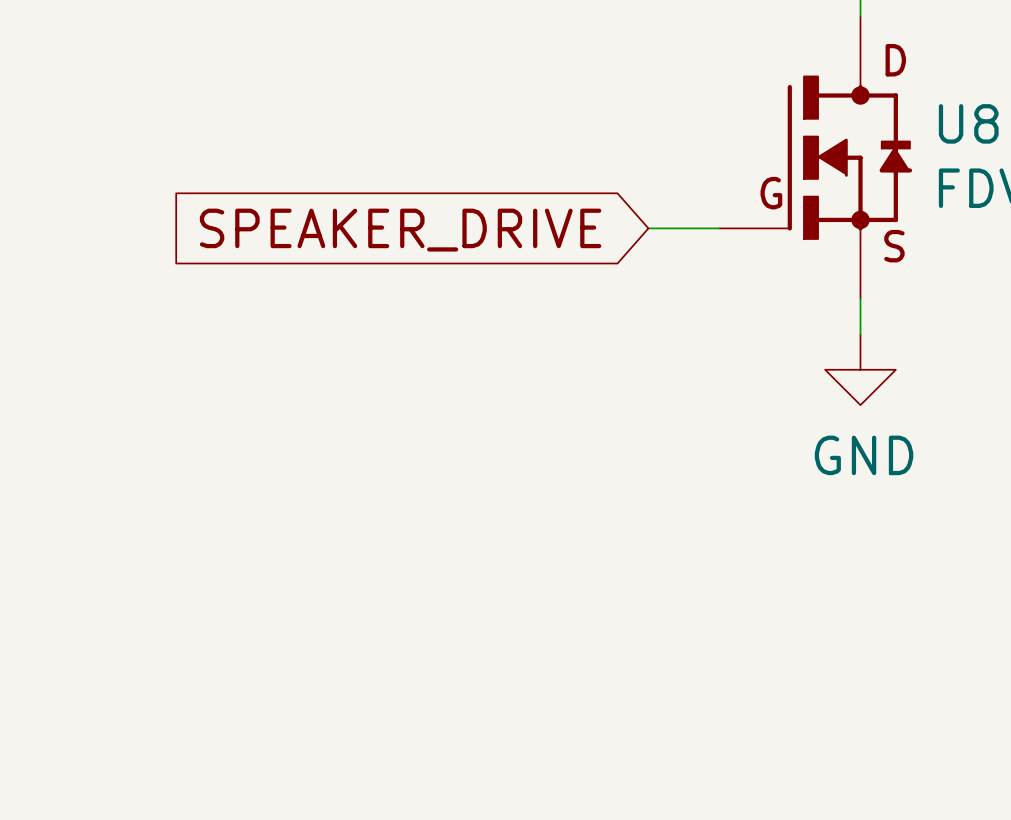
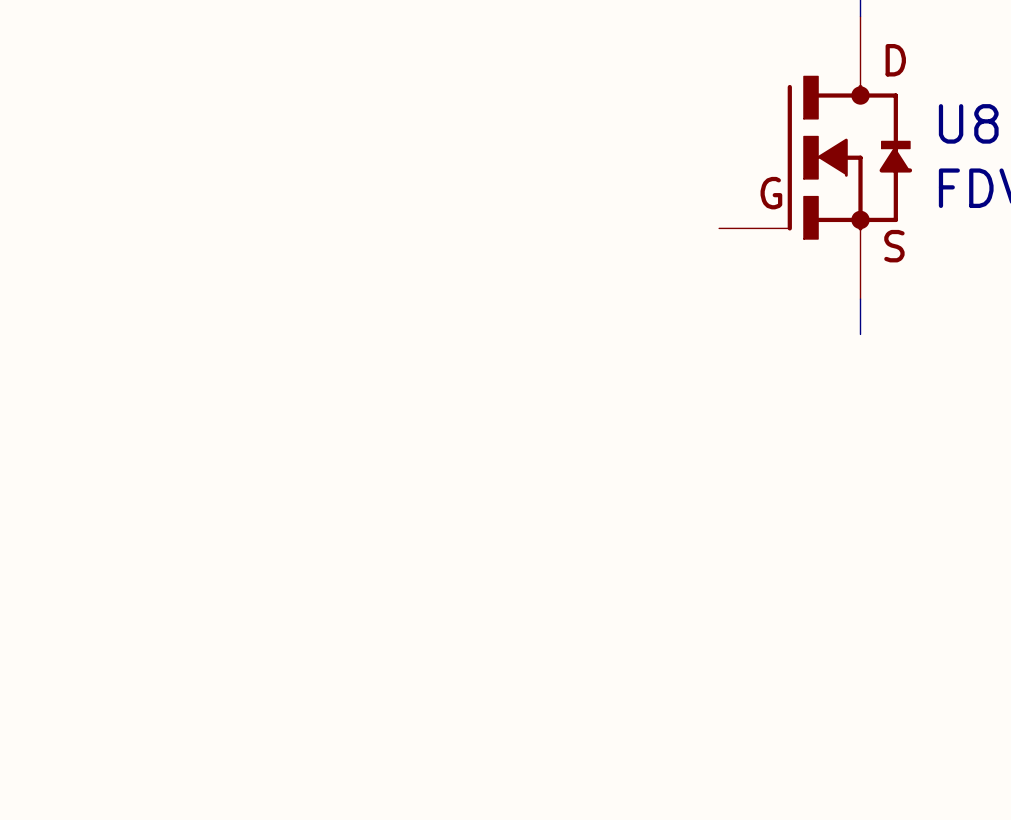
wire: (648, 228) (719, 228) -> none
global label: SPEAKER_DRIVE (400, 230) -> none
power symbol: GND (860, 369) -> none

